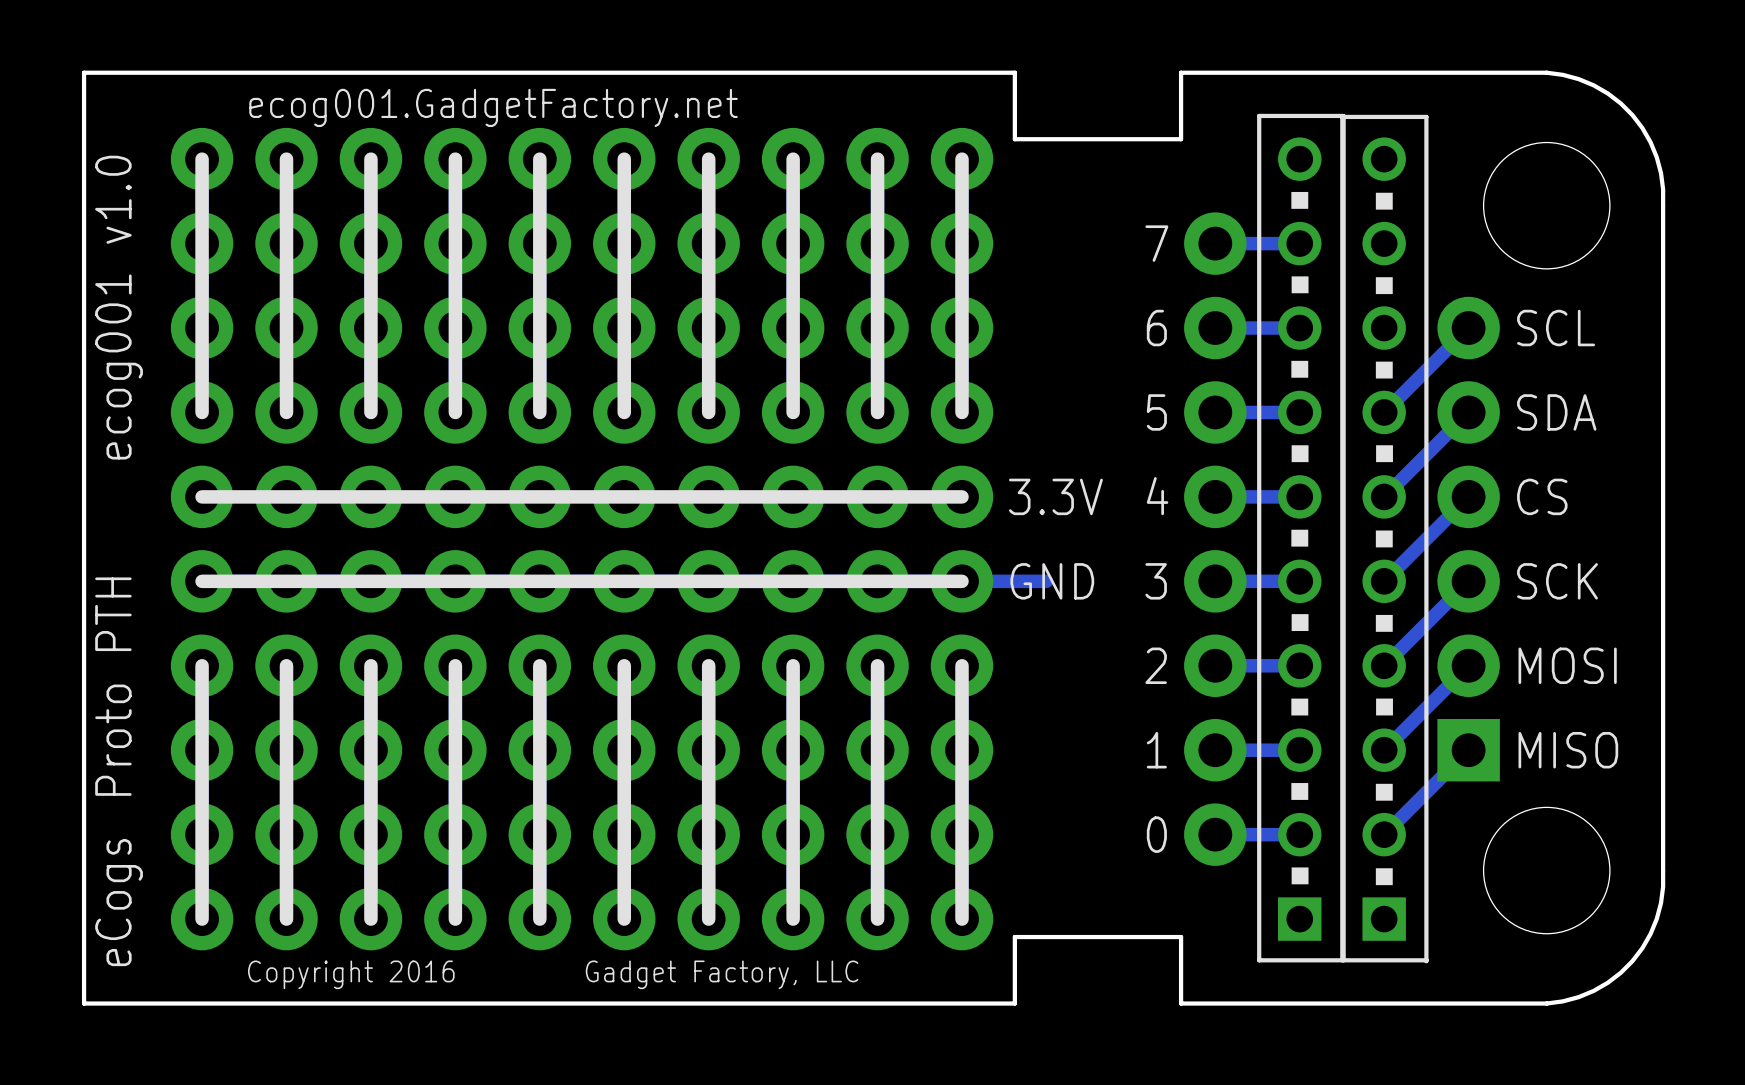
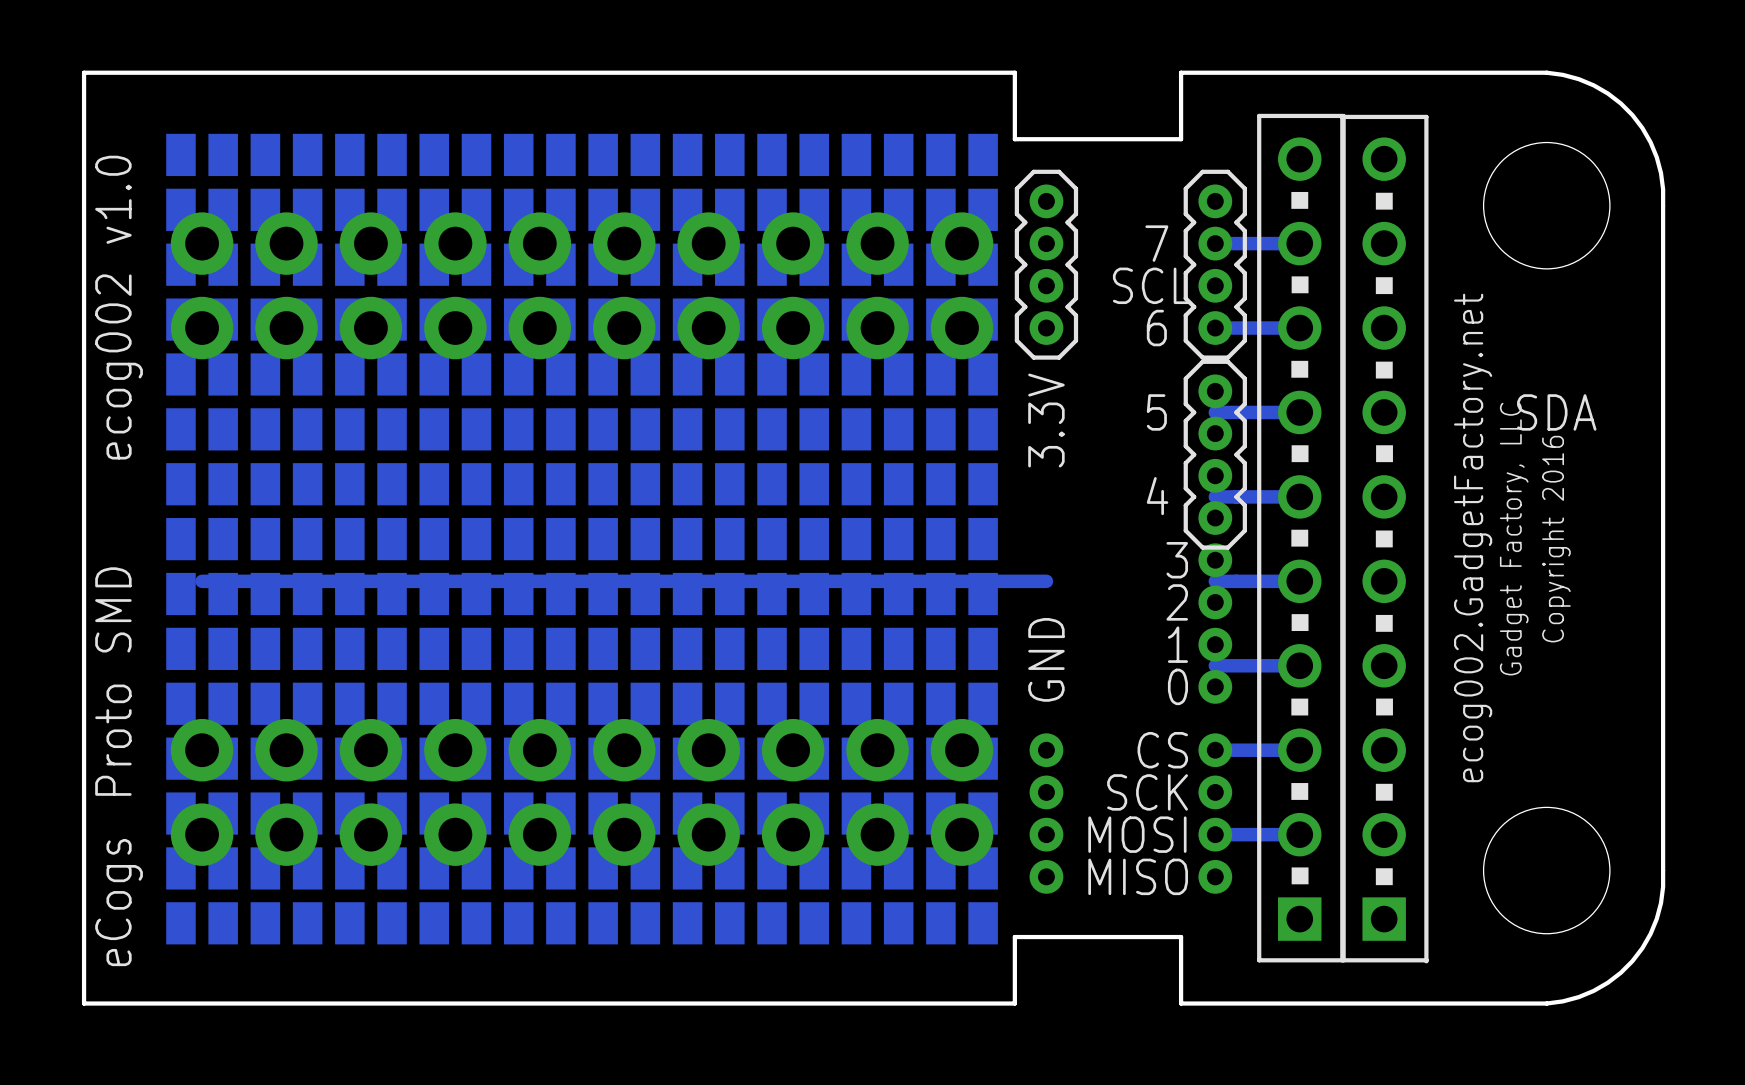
text: ecog001.GadgetFactory.net (493, 107) -> none
line: (202, 159) (202, 412) -> none
line: (286, 159) (286, 412) -> none
line: (370, 159) (370, 412) -> none
line: (455, 159) (455, 412) -> none
line: (539, 159) (539, 412) -> none
part: (582, 159) -> none
line: (624, 159) (624, 412) -> none
line: (708, 159) (708, 412) -> none
line: (793, 159) (793, 412) -> none
line: (877, 159) (877, 412) -> none
line: (962, 159) (962, 412) -> none
part: none -> (265, 264)
part: none -> (476, 264)
part: none -> (687, 264)
part: none -> (898, 264)
part: none -> (1046, 264)
part: none -> (1215, 264)
text: ecog001 v1.0 (119, 307) -> ecog002 v1.0 (119, 307)
track: (1468, 328) (1384, 412) -> none
text position: SCL (1556, 328) -> SCL (1151, 285)
part: (1468, 370) -> none
part: (582, 412) -> none
track: (1468, 412) (1384, 496) -> none
part: none -> (1215, 454)
part: (582, 496) -> none
line: (962, 496) (202, 496) -> none
text rotation: 0° (1055, 496) -> 90° counterclockwise (1046, 420)
track: (1468, 496) (1384, 581) -> none
text position: CS (1542, 496) -> CS (1162, 750)
text: none -> ecog002.GadgetFactory.net (1473, 537)
part: none -> (265, 539)
part: none -> (476, 539)
part: none -> (687, 539)
part: none -> (898, 539)
part: (1215, 539) -> none
text: none -> Gadget Factory, LLC (1514, 539)
text: none -> Copyright 2016 (1556, 539)
part: (582, 581) -> none
line: (962, 581) (202, 581) -> none
text rotation: 0° (1052, 581) -> 90° counterclockwise (1046, 659)
text position: 3 (1156, 581) -> 3 (1177, 560)
track: (1468, 581) (1384, 665) -> none
text position: SCK (1557, 581) -> SCK (1147, 792)
part: none -> (1215, 623)
part: (1468, 623) -> none
line: (202, 665) (202, 919) -> none
line: (286, 665) (286, 919) -> none
line: (370, 665) (370, 919) -> none
line: (455, 665) (455, 919) -> none
line: (539, 665) (539, 919) -> none
part: (582, 665) -> none
line: (624, 665) (624, 919) -> none
line: (708, 665) (708, 919) -> none
line: (793, 665) (793, 919) -> none
line: (877, 665) (877, 919) -> none
line: (962, 665) (962, 919) -> none
text position: 2 (1156, 665) -> 2 (1177, 602)
track: (1468, 665) (1384, 750) -> none
text position: MOSI (1567, 665) -> MOSI (1137, 834)
text: Proto PTH (113, 686) -> Proto SMD (113, 681)
text position: 1 (1156, 750) -> 1 (1177, 644)
track: (1468, 750) (1384, 834) -> none
text position: MISO (1568, 750) -> MISO (1138, 876)
part: none -> (265, 813)
part: none -> (476, 813)
part: none -> (687, 813)
part: none -> (898, 813)
part: none -> (1046, 813)
part: none -> (1215, 813)
text position: 0 (1156, 834) -> 0 (1177, 686)
part: (582, 919) -> none
text: Copyright 2016 (351, 974) -> none
text: Gadget Factory, LLC (722, 974) -> none

